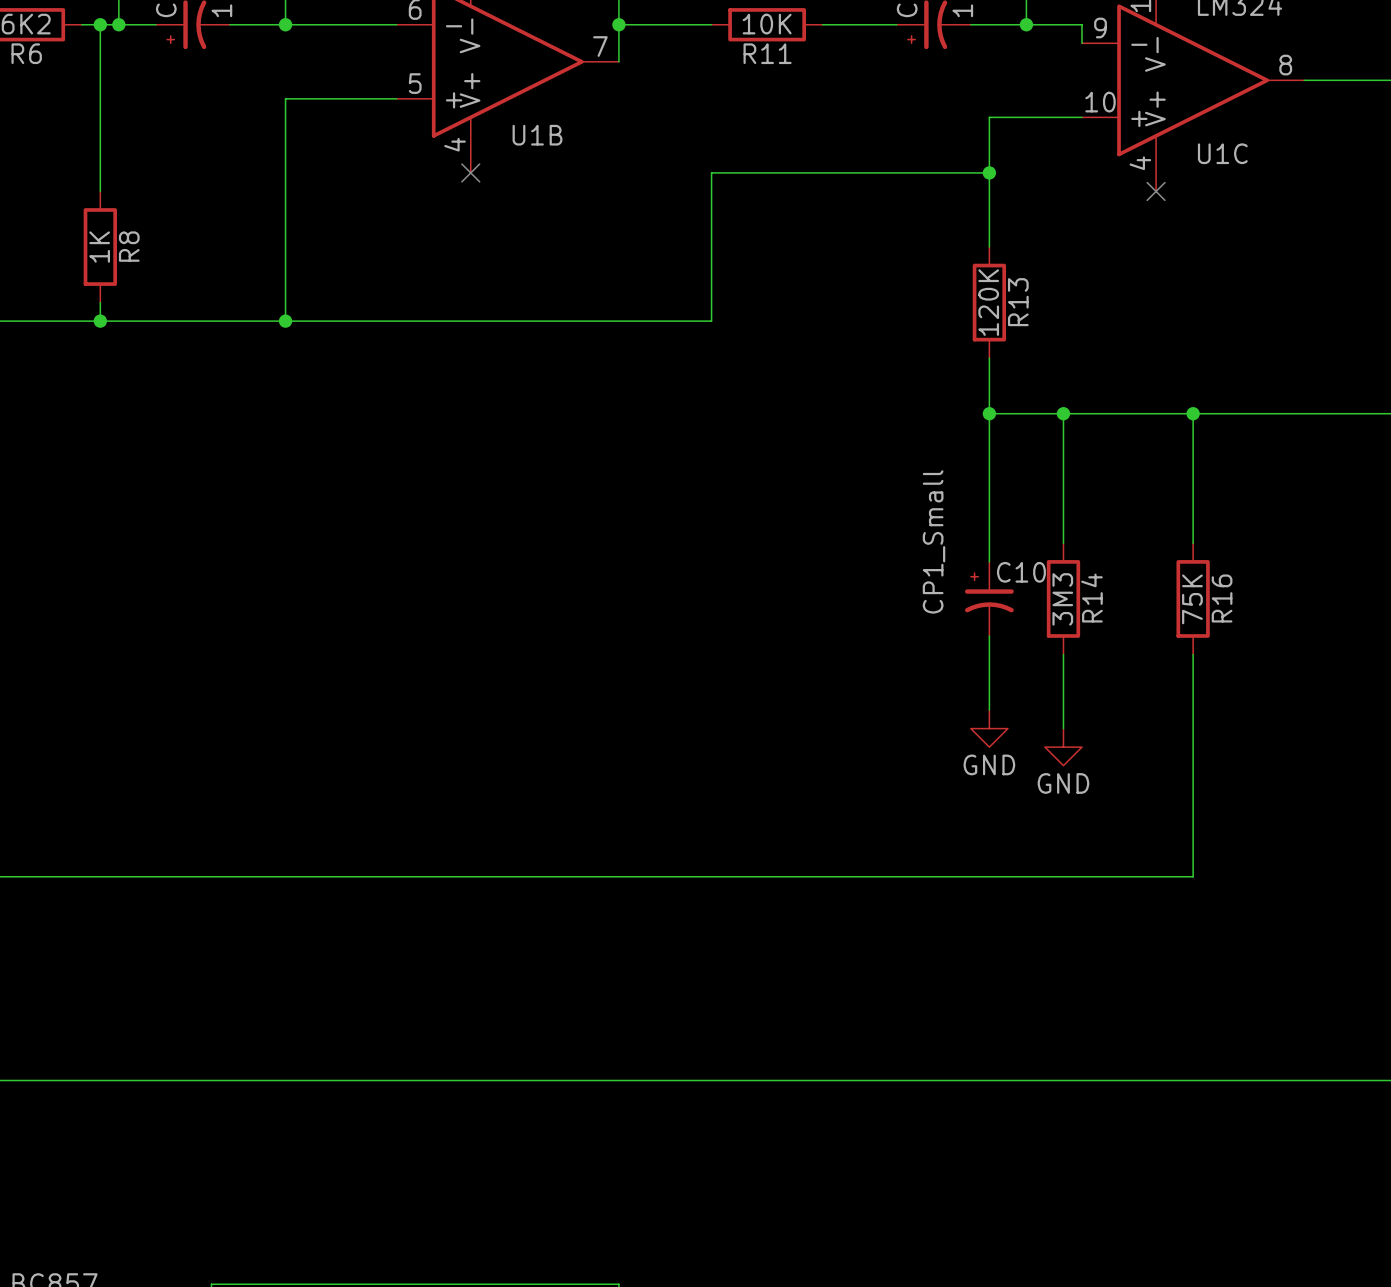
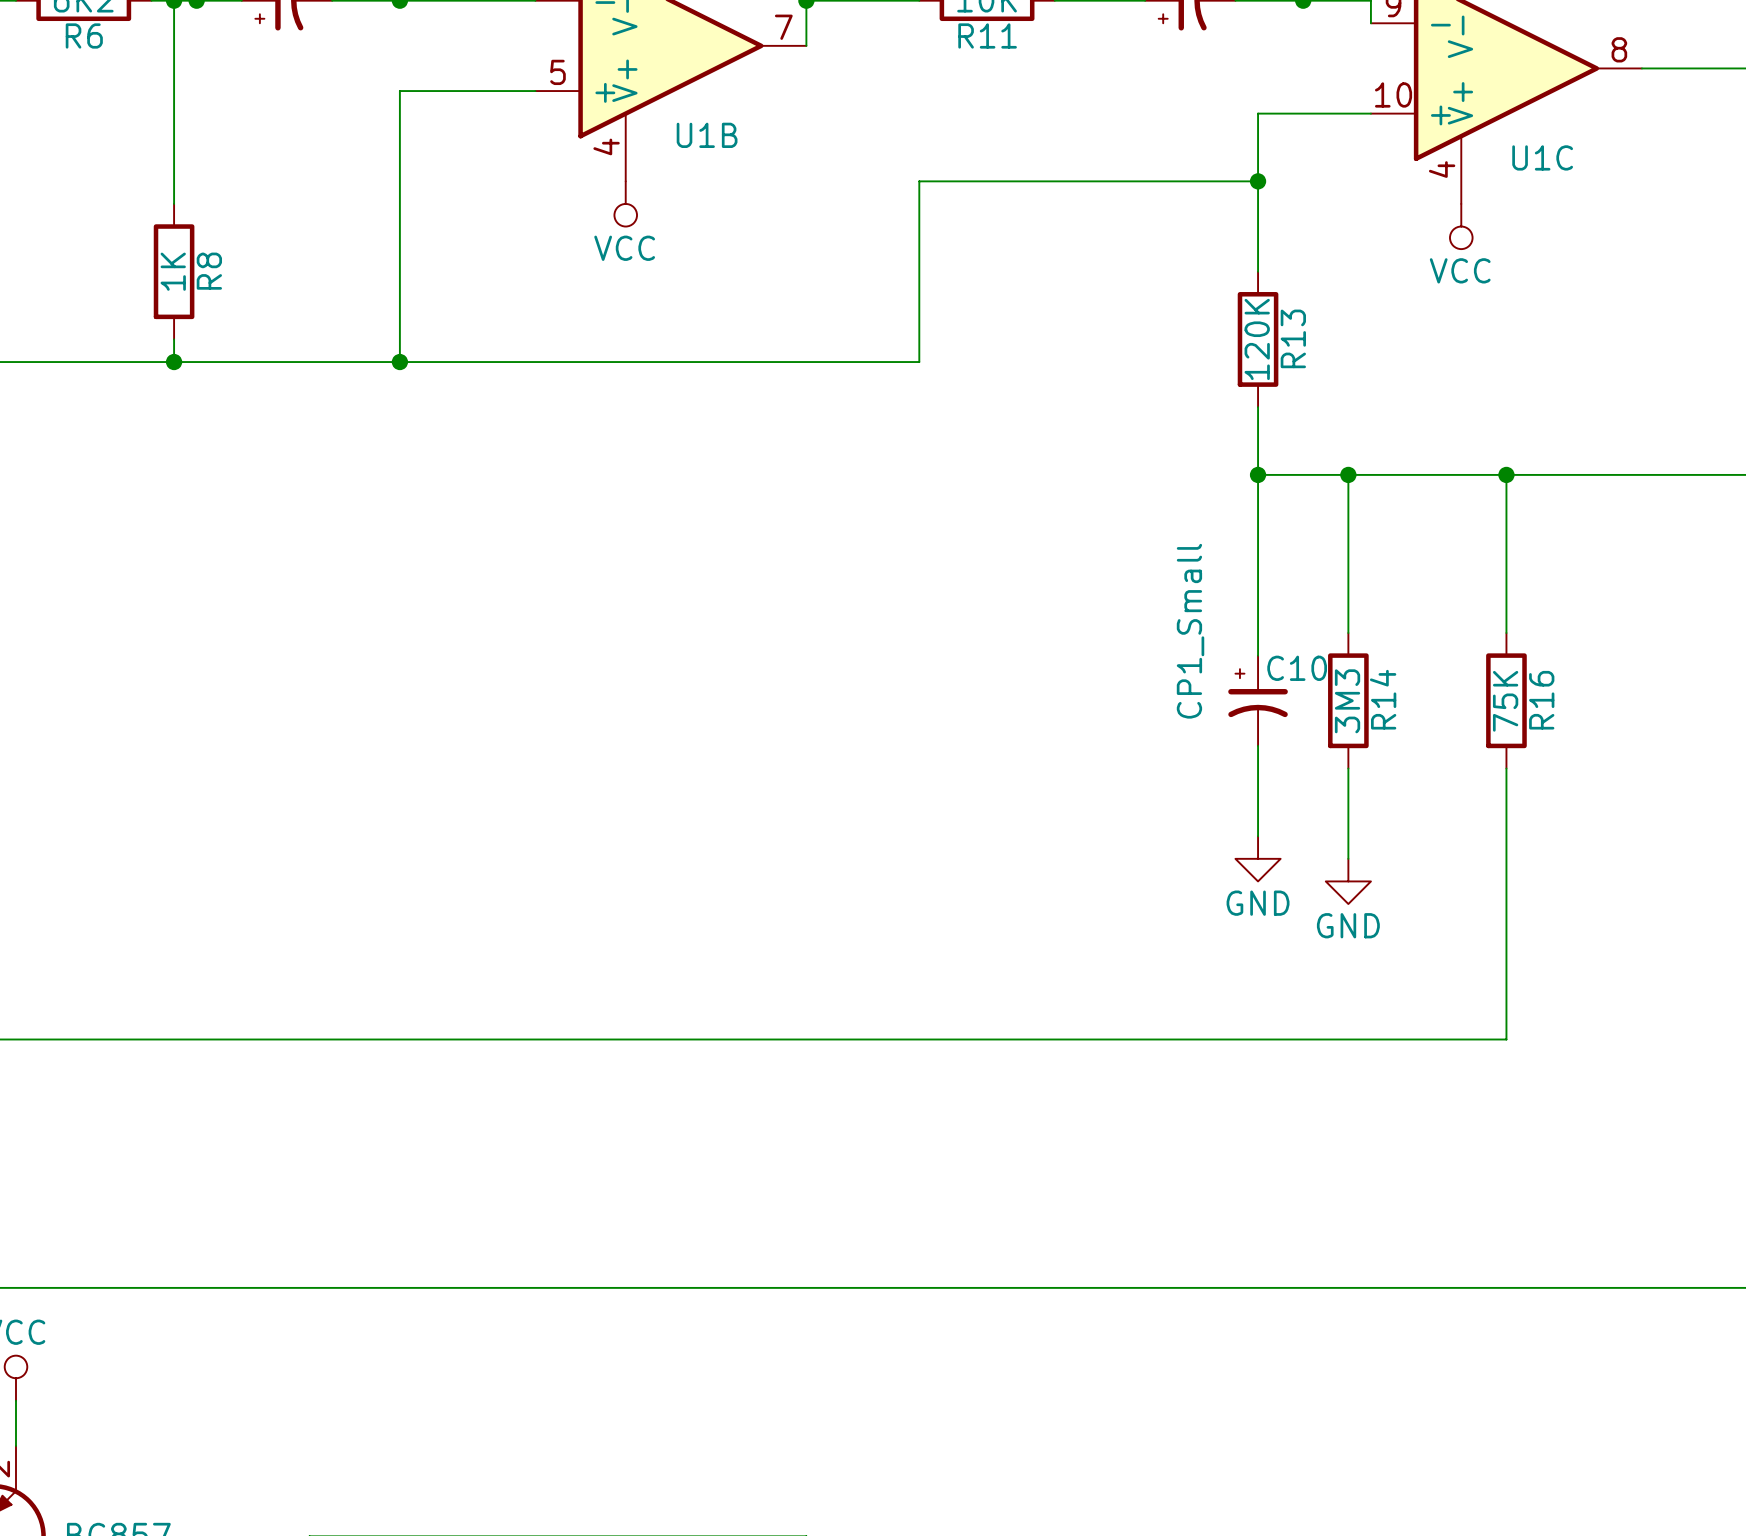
no-connect mark: (470, 172) -> none
power symbol: none -> VCC (625, 203)
no-connect mark: (1156, 191) -> none
power symbol: none -> VCC (1461, 226)

